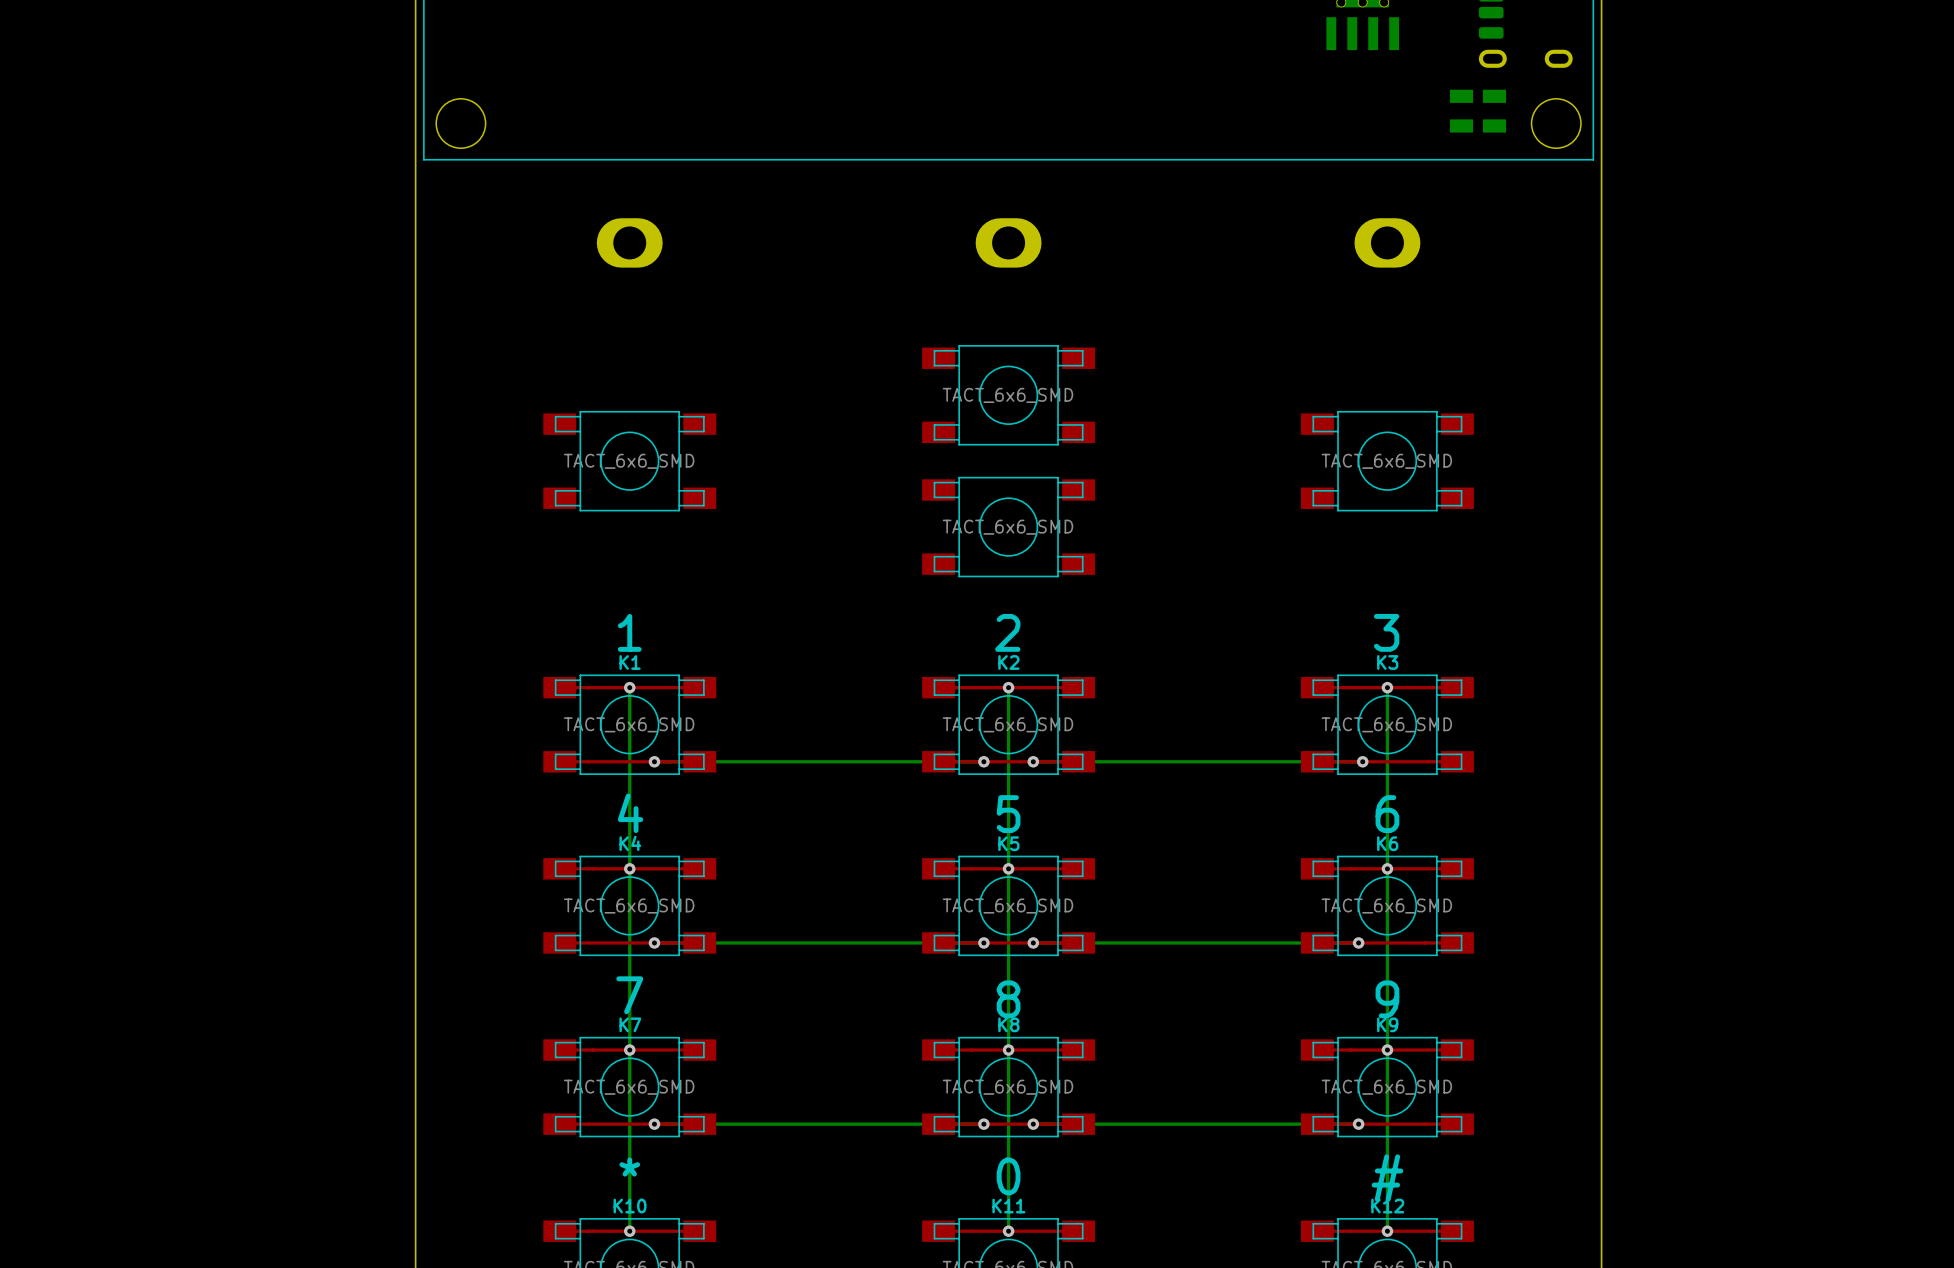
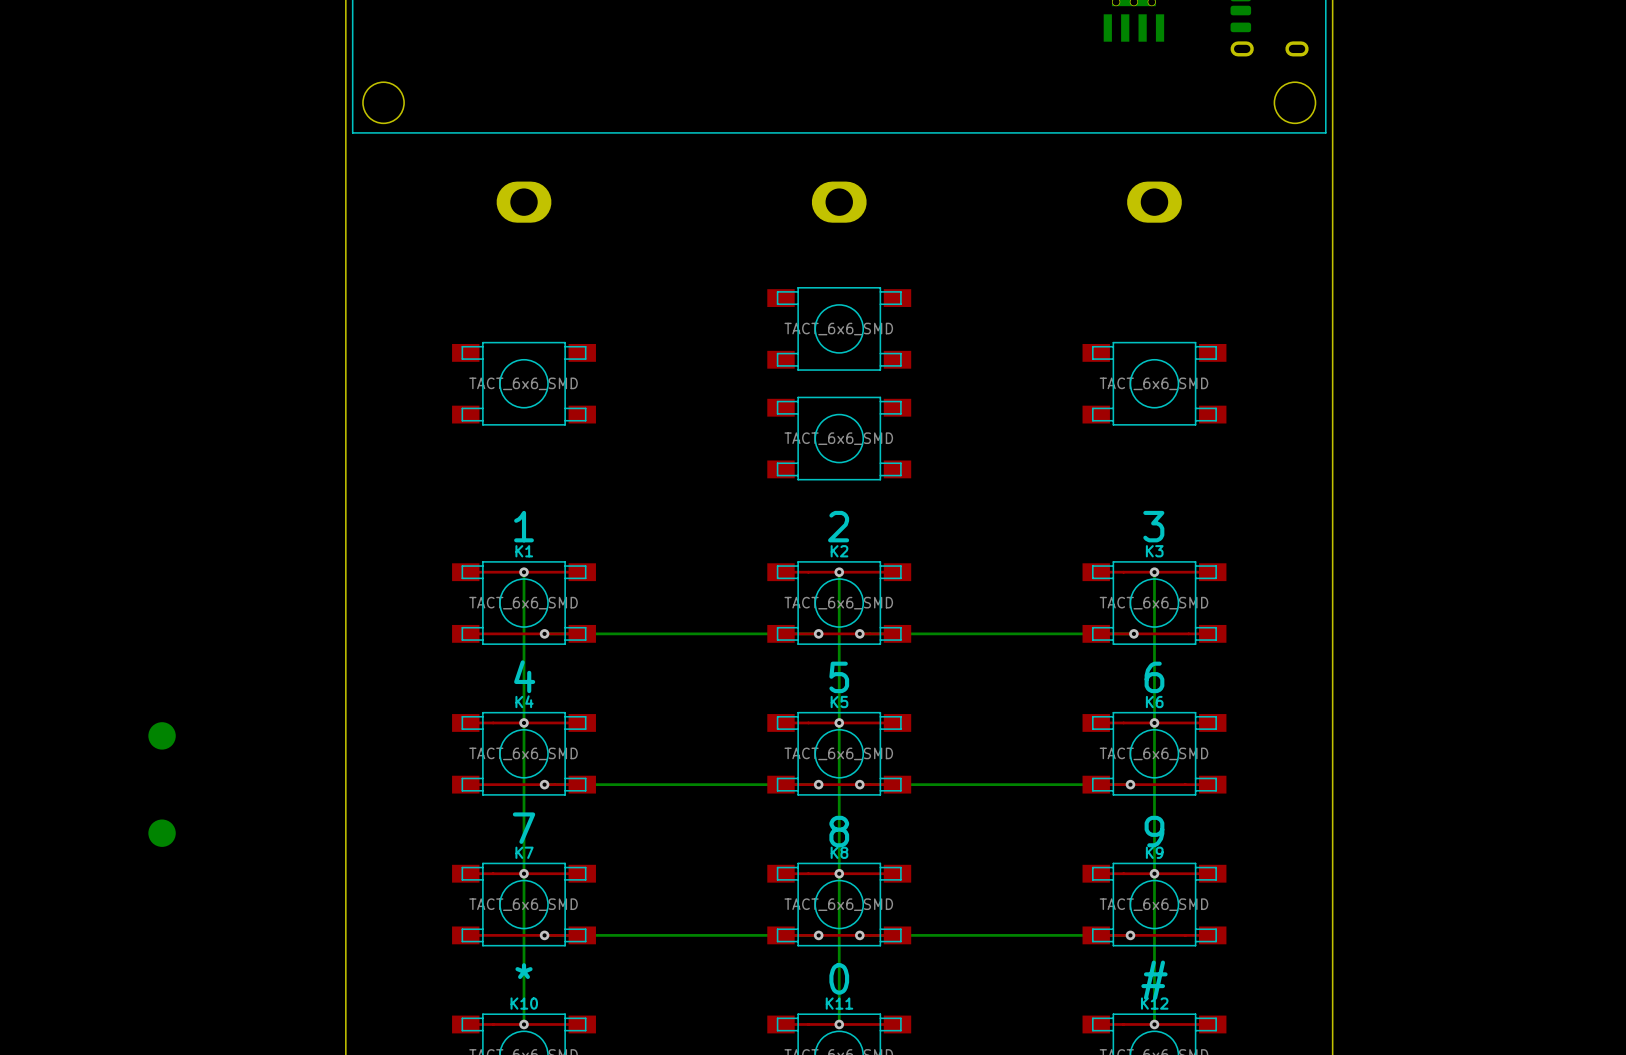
part: (1461, 111) -> none
part: (1494, 111) -> none
part: none -> (162, 735)
part: none -> (162, 833)

